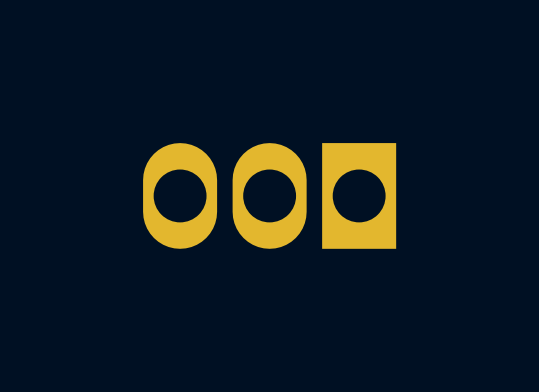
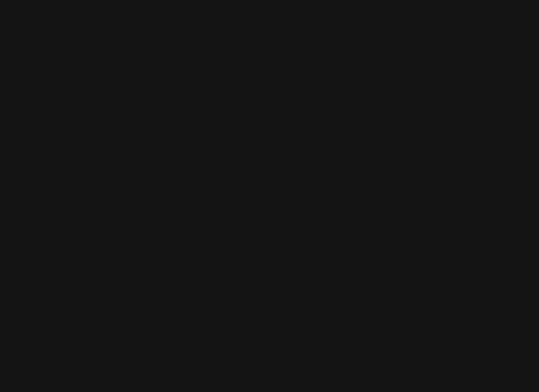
part: (269, 195) -> none

